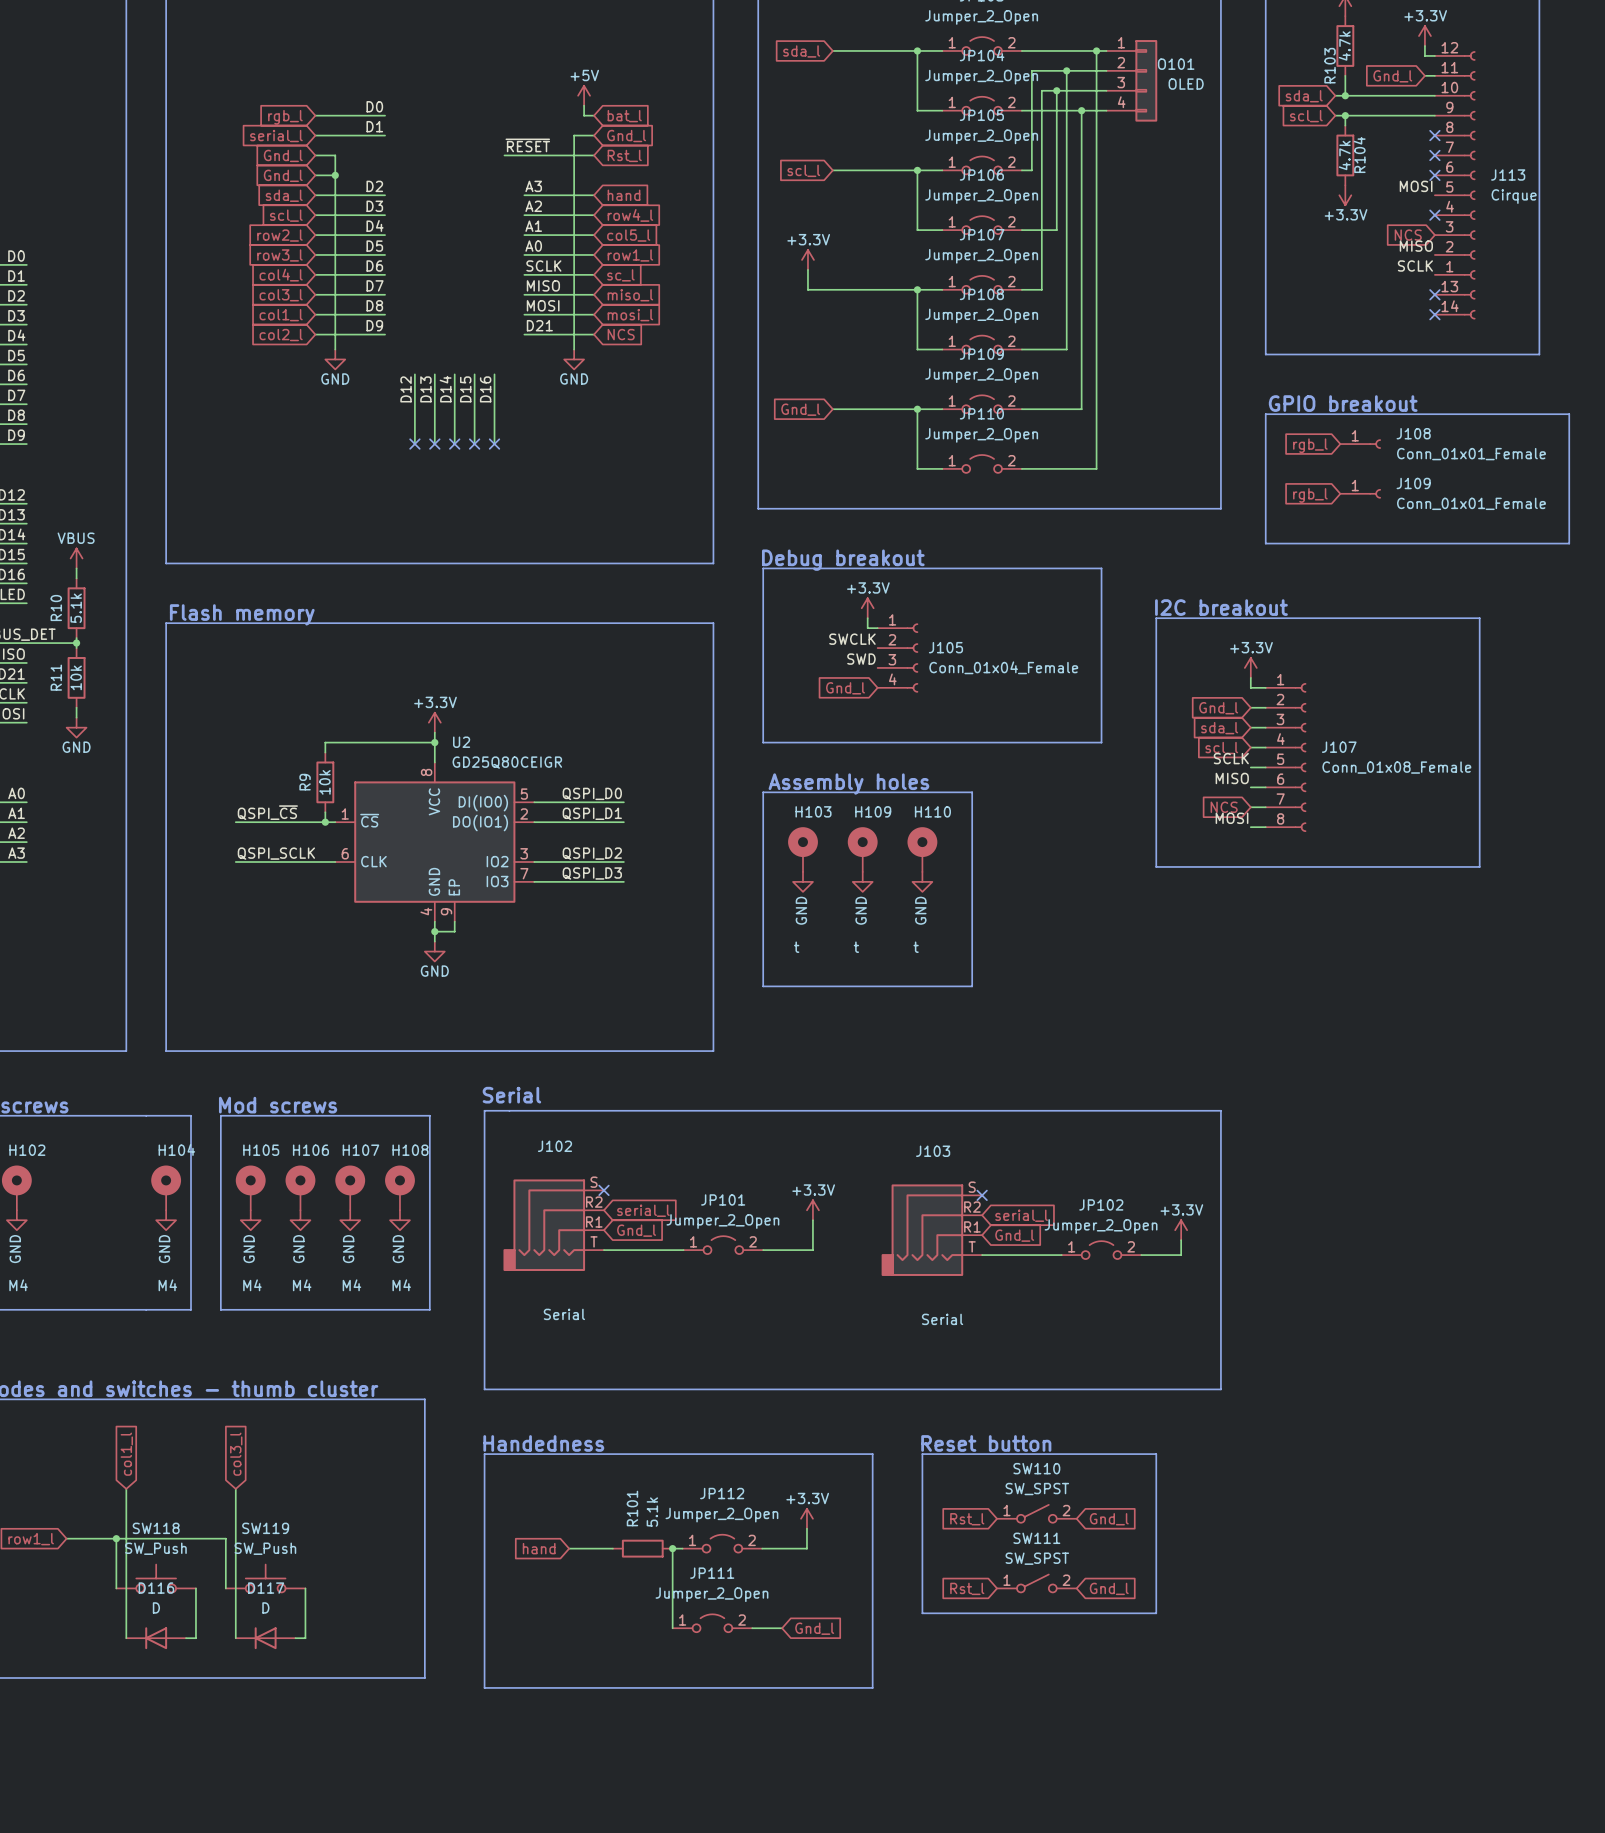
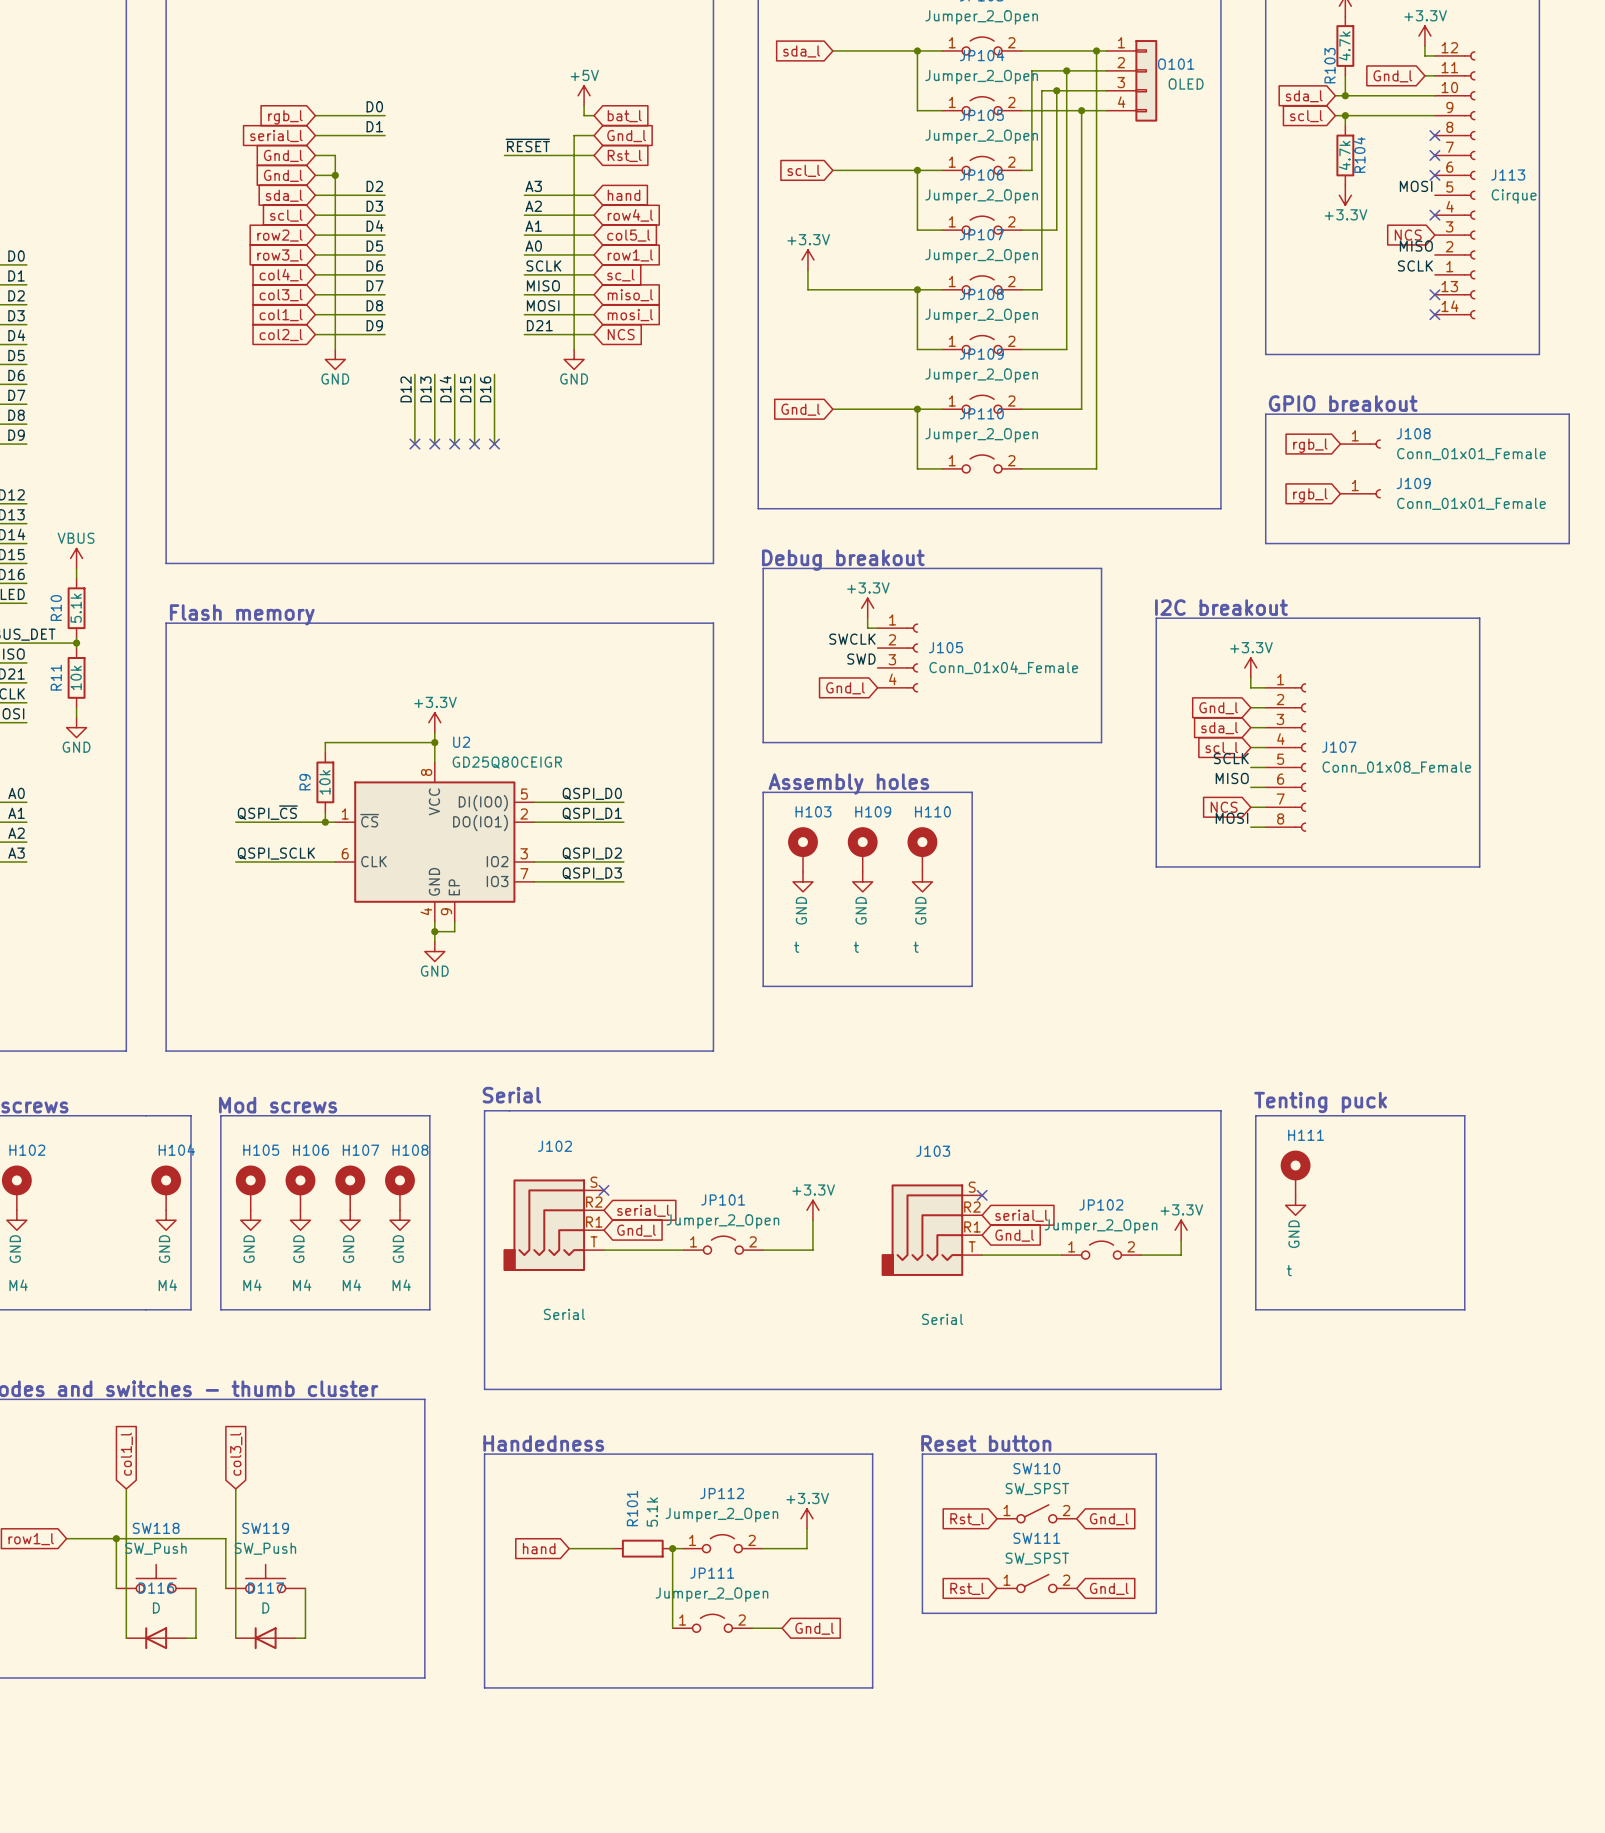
text: none -> Tenting puck (1320, 1102)
line: none -> (1255, 1115) (1255, 1309) (1464, 1309) (1464, 1115) (1255, 1115)
H111: none -> t (1295, 1172)
power symbol: none -> GND (1295, 1205)

